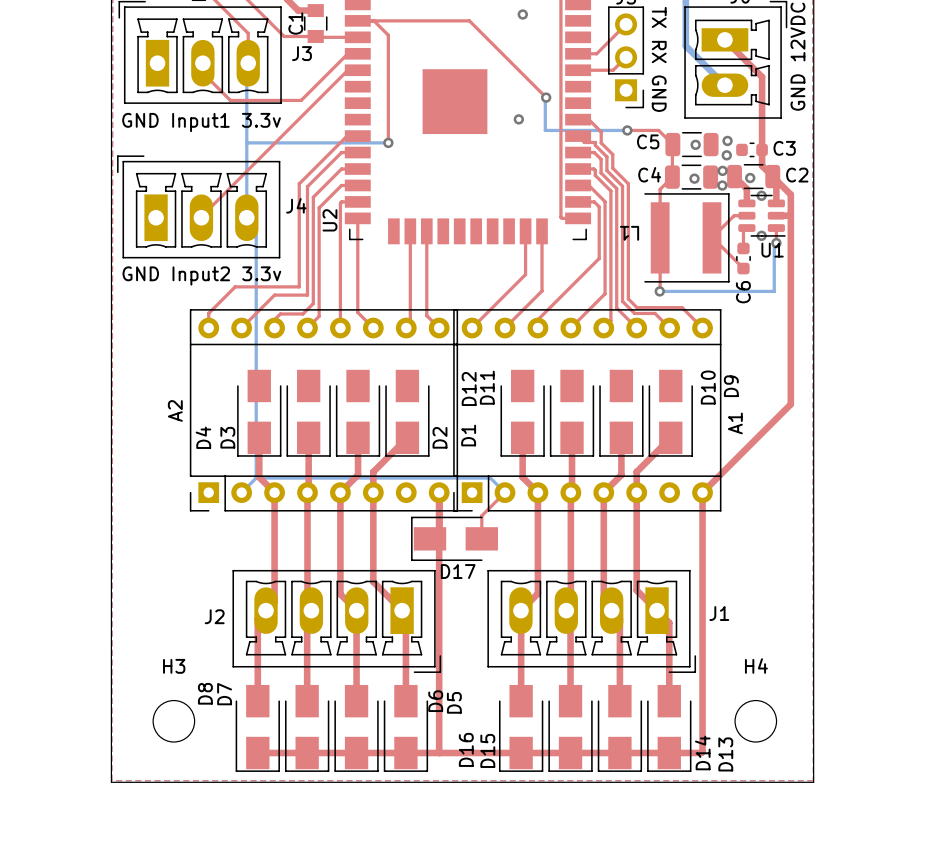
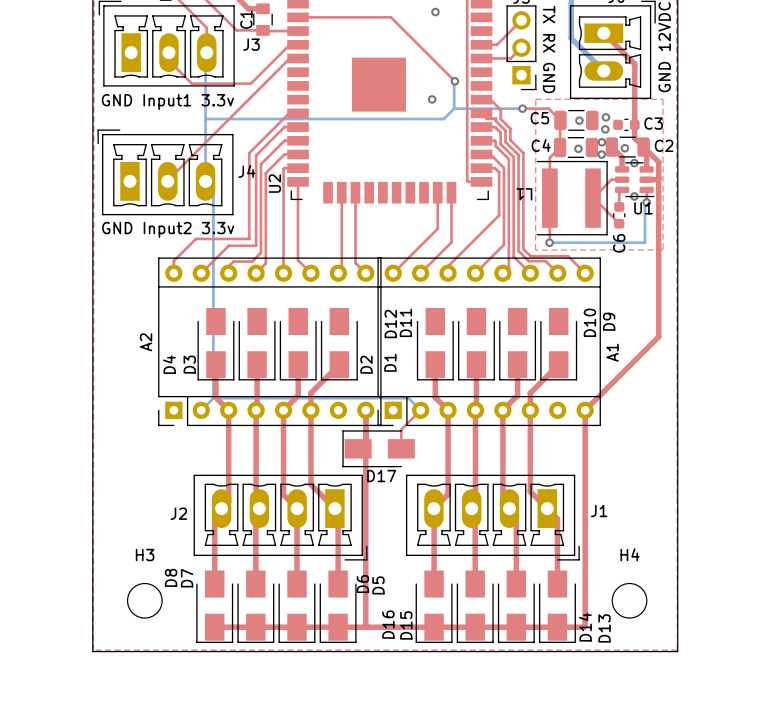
top track: (373, 20) (388, 35) (388, 142) -> none
top zone outline: none -> (535, 99) (535, 250) (662, 249) (662, 99) (535, 99)
bottom track: none -> (454, 108) (443, 119) (323, 119)
via: (388, 142) -> none

